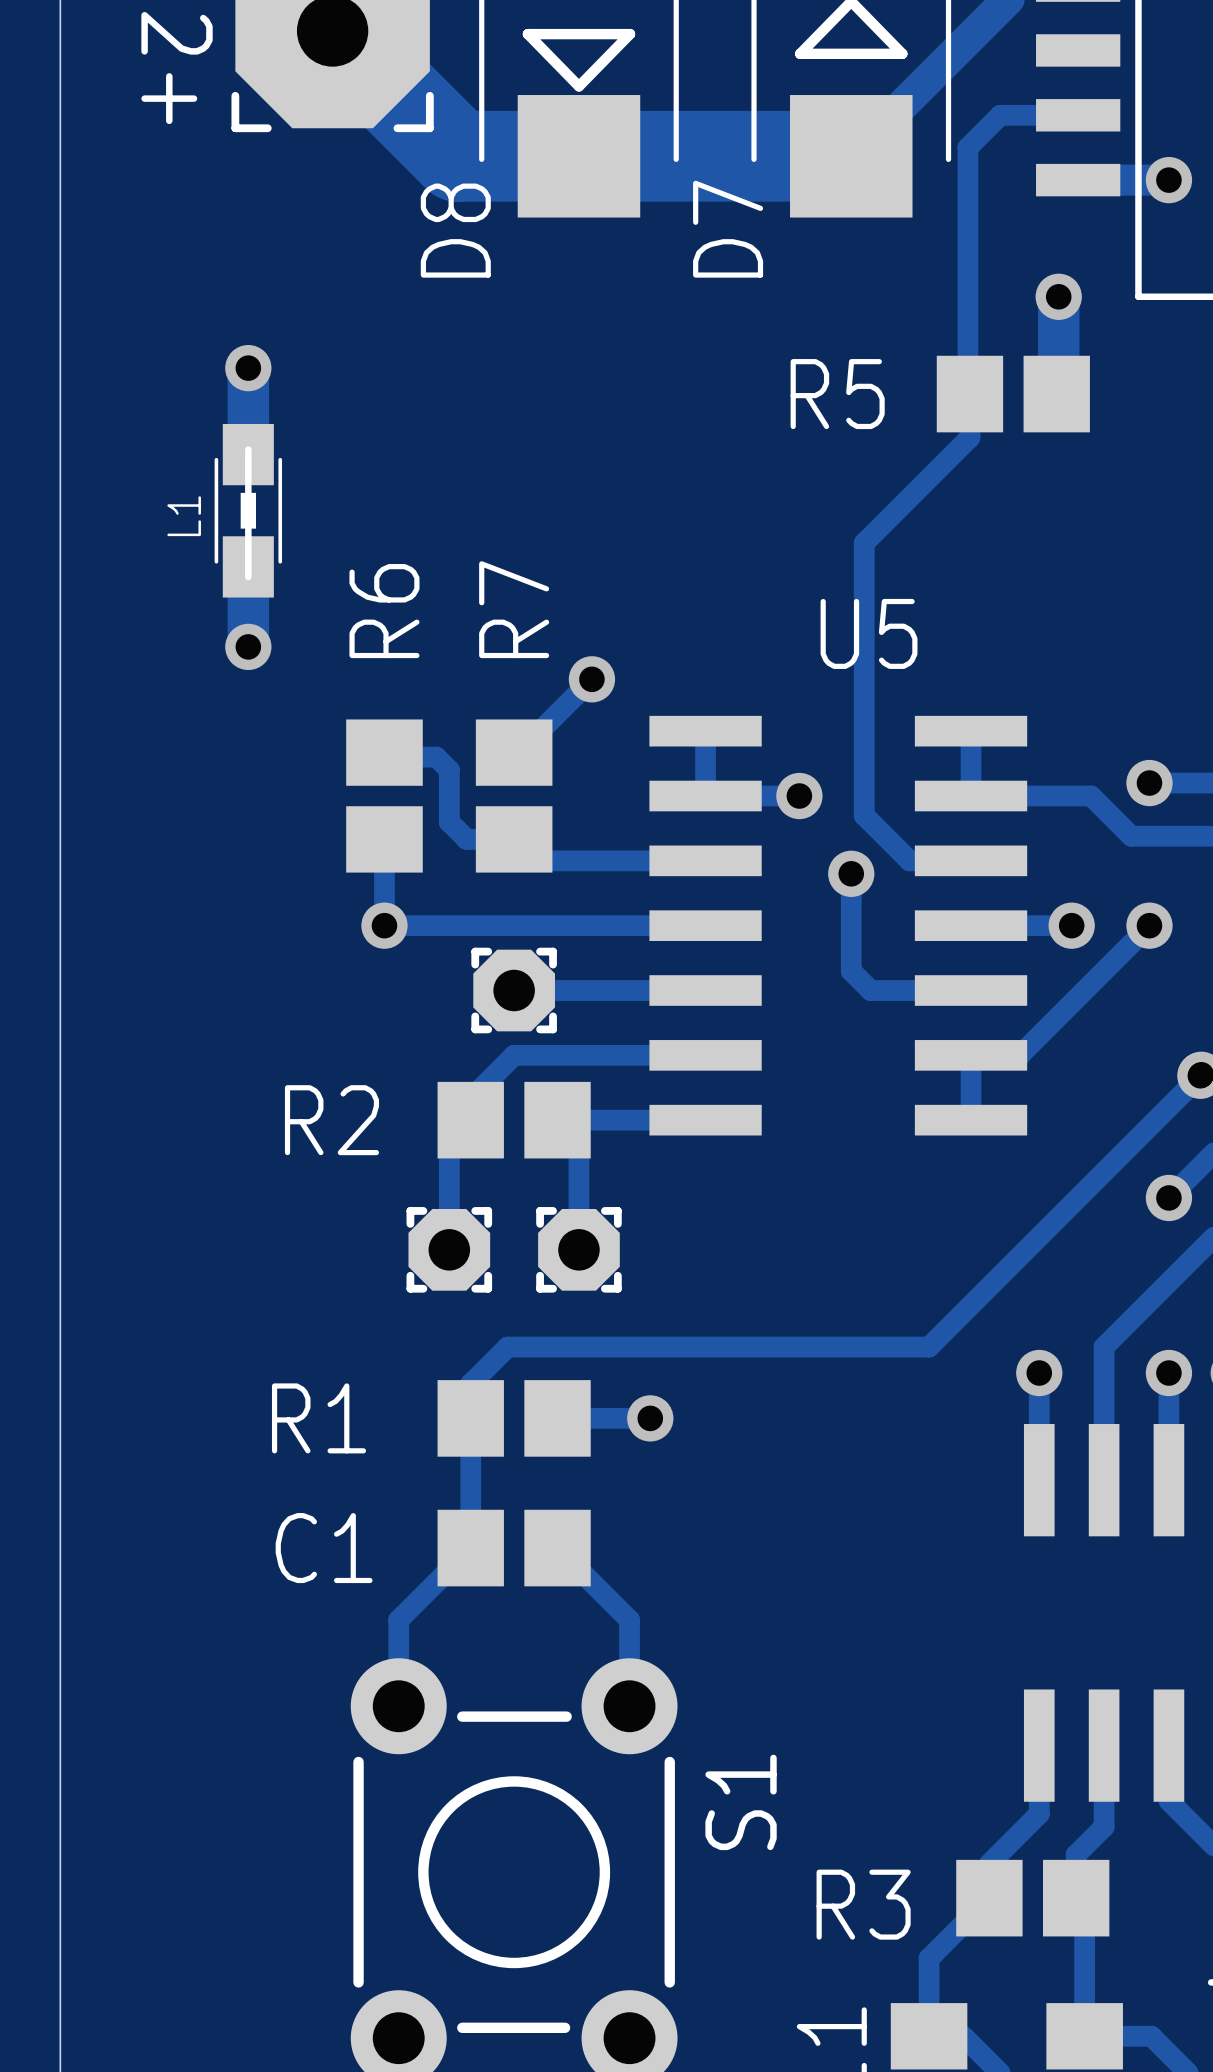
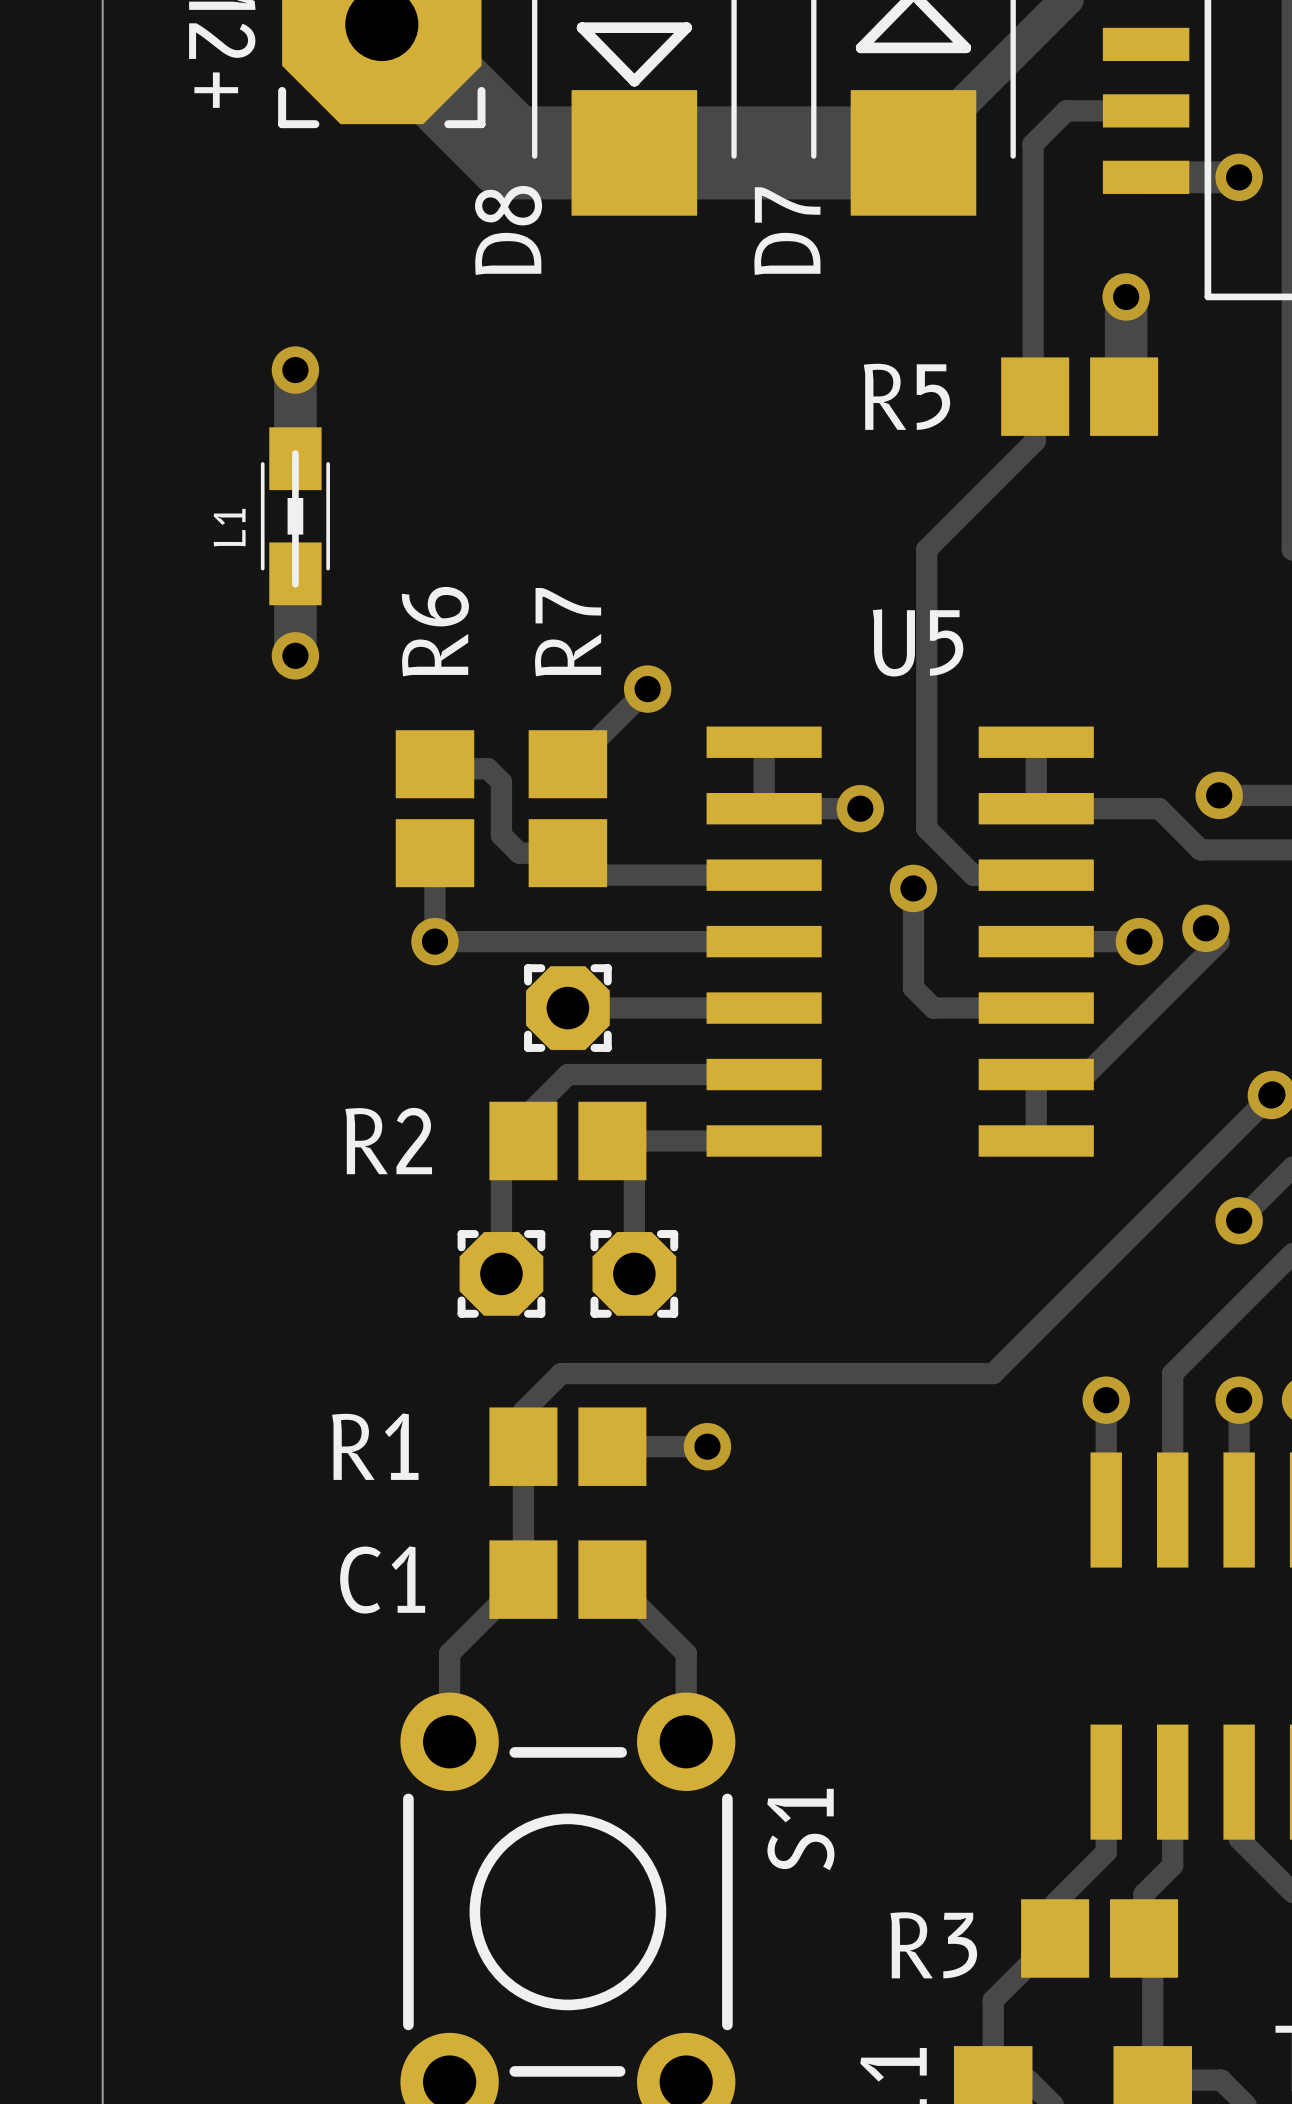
via position: (1149, 925) -> (1205, 928)

